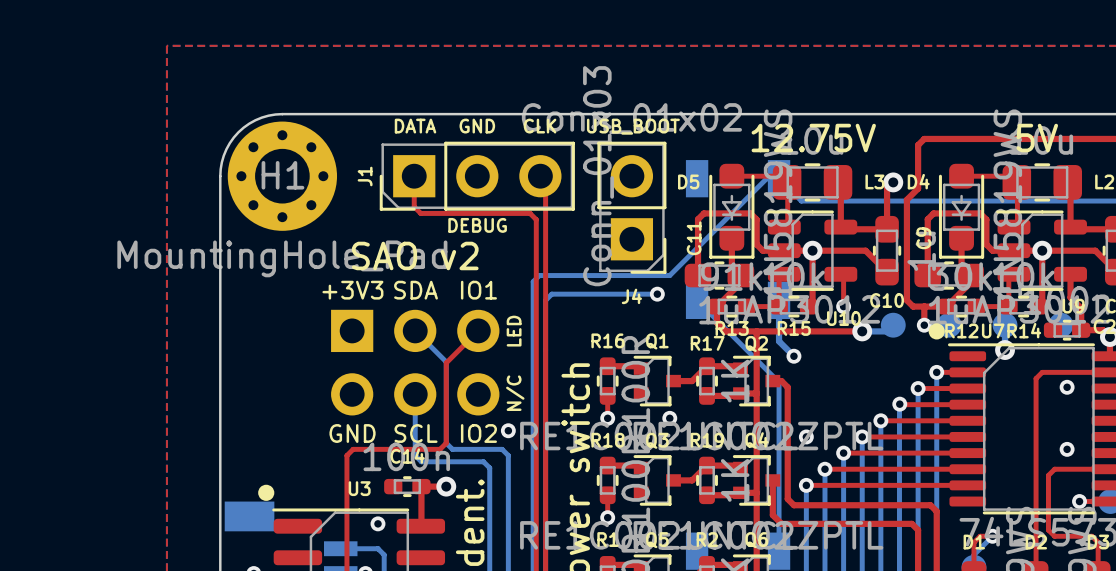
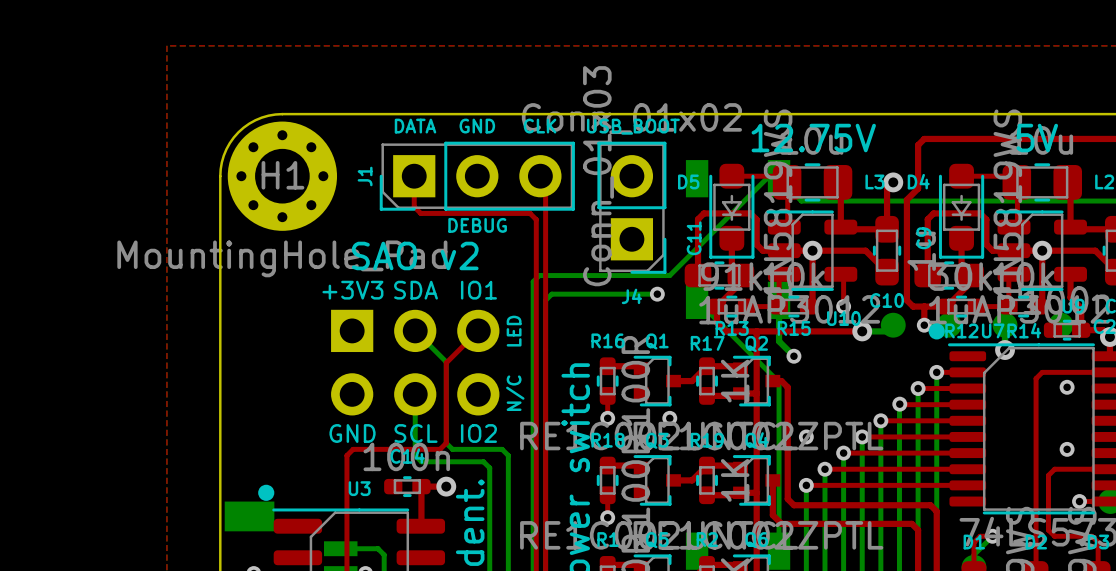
via: (508, 430) -> none
via: (377, 523) -> none

